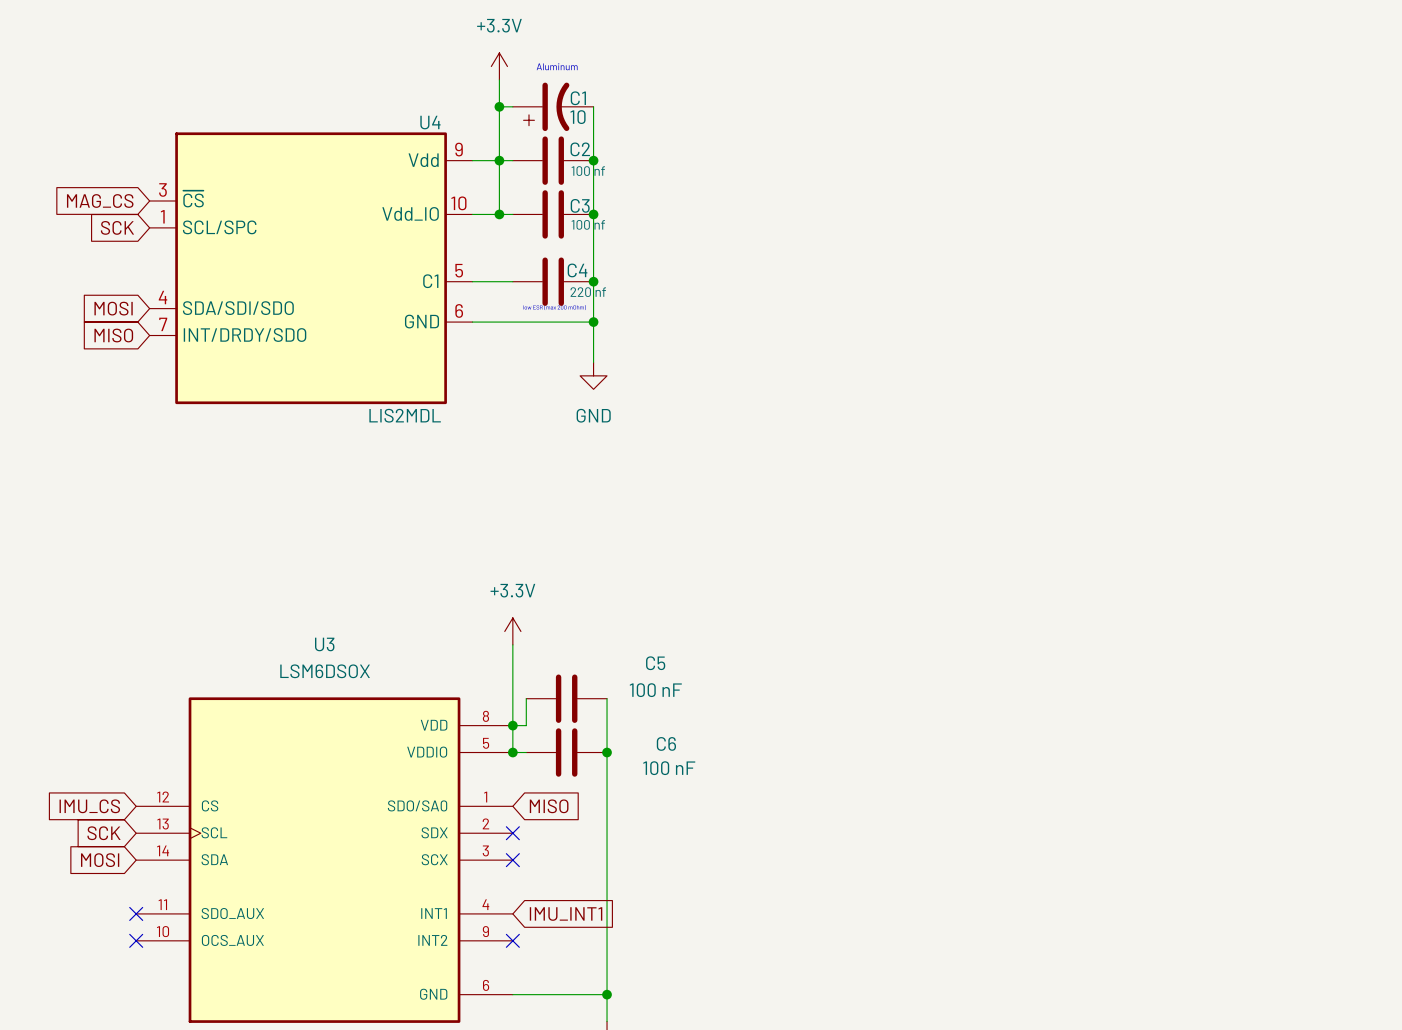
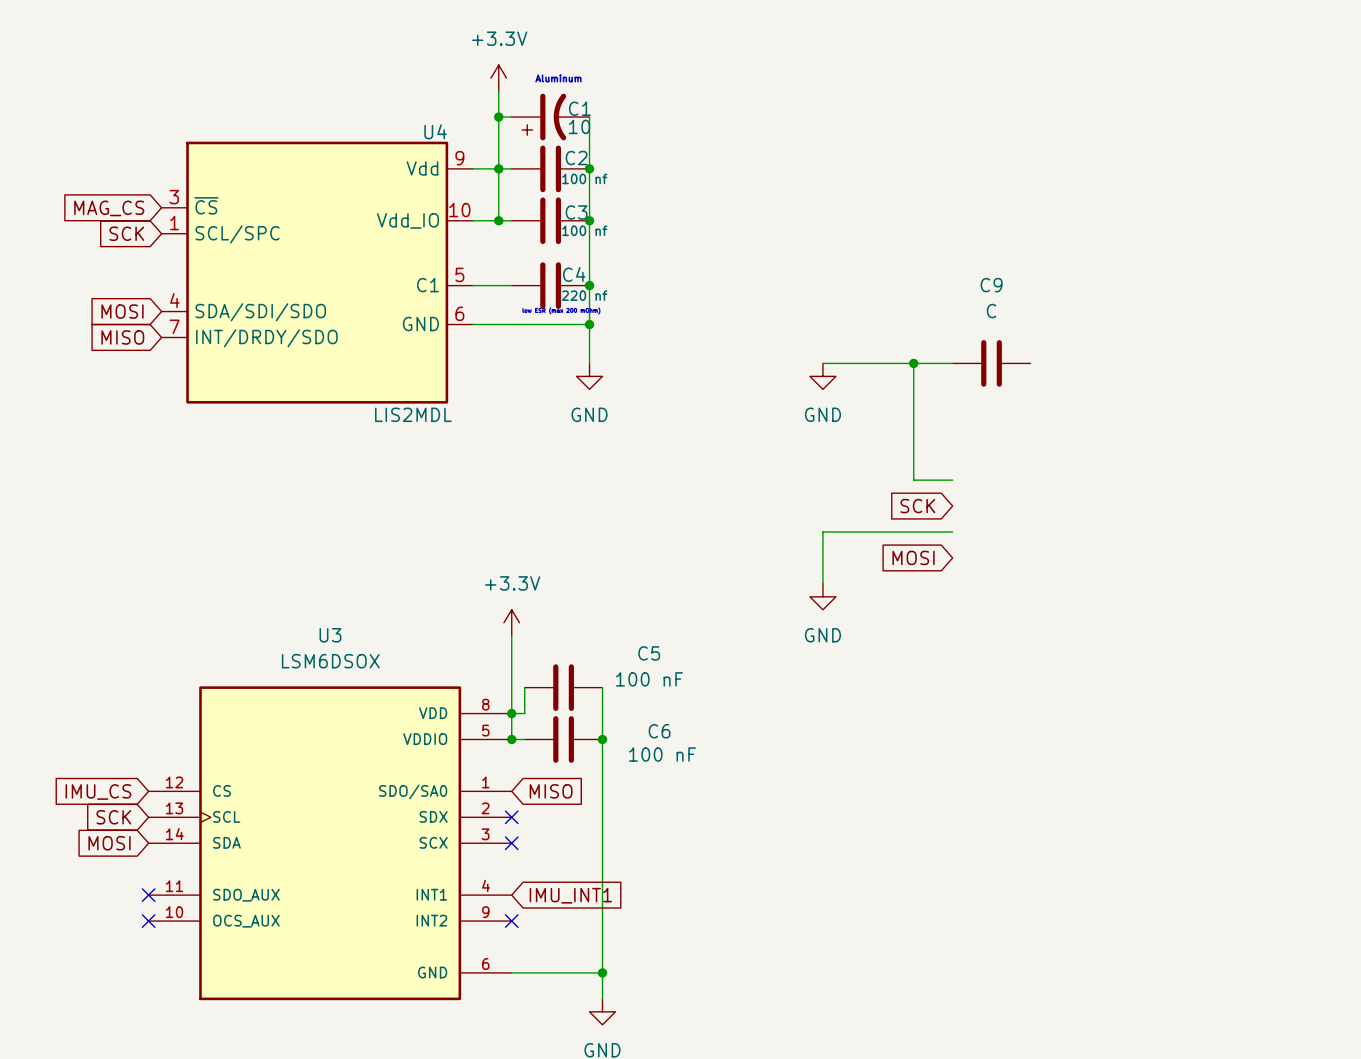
wire: none -> (822, 363) (952, 363)
wire: none -> (913, 363) (913, 480) (952, 480)
junction: none -> (913, 363)
C9: none -> C (991, 363)
power symbol: none -> GND (822, 376)
global label: none -> SCK (917, 506)
wire: none -> (952, 532) (822, 532) (822, 583)
global label: none -> MOSI (913, 557)
power symbol: none -> GND (822, 596)

